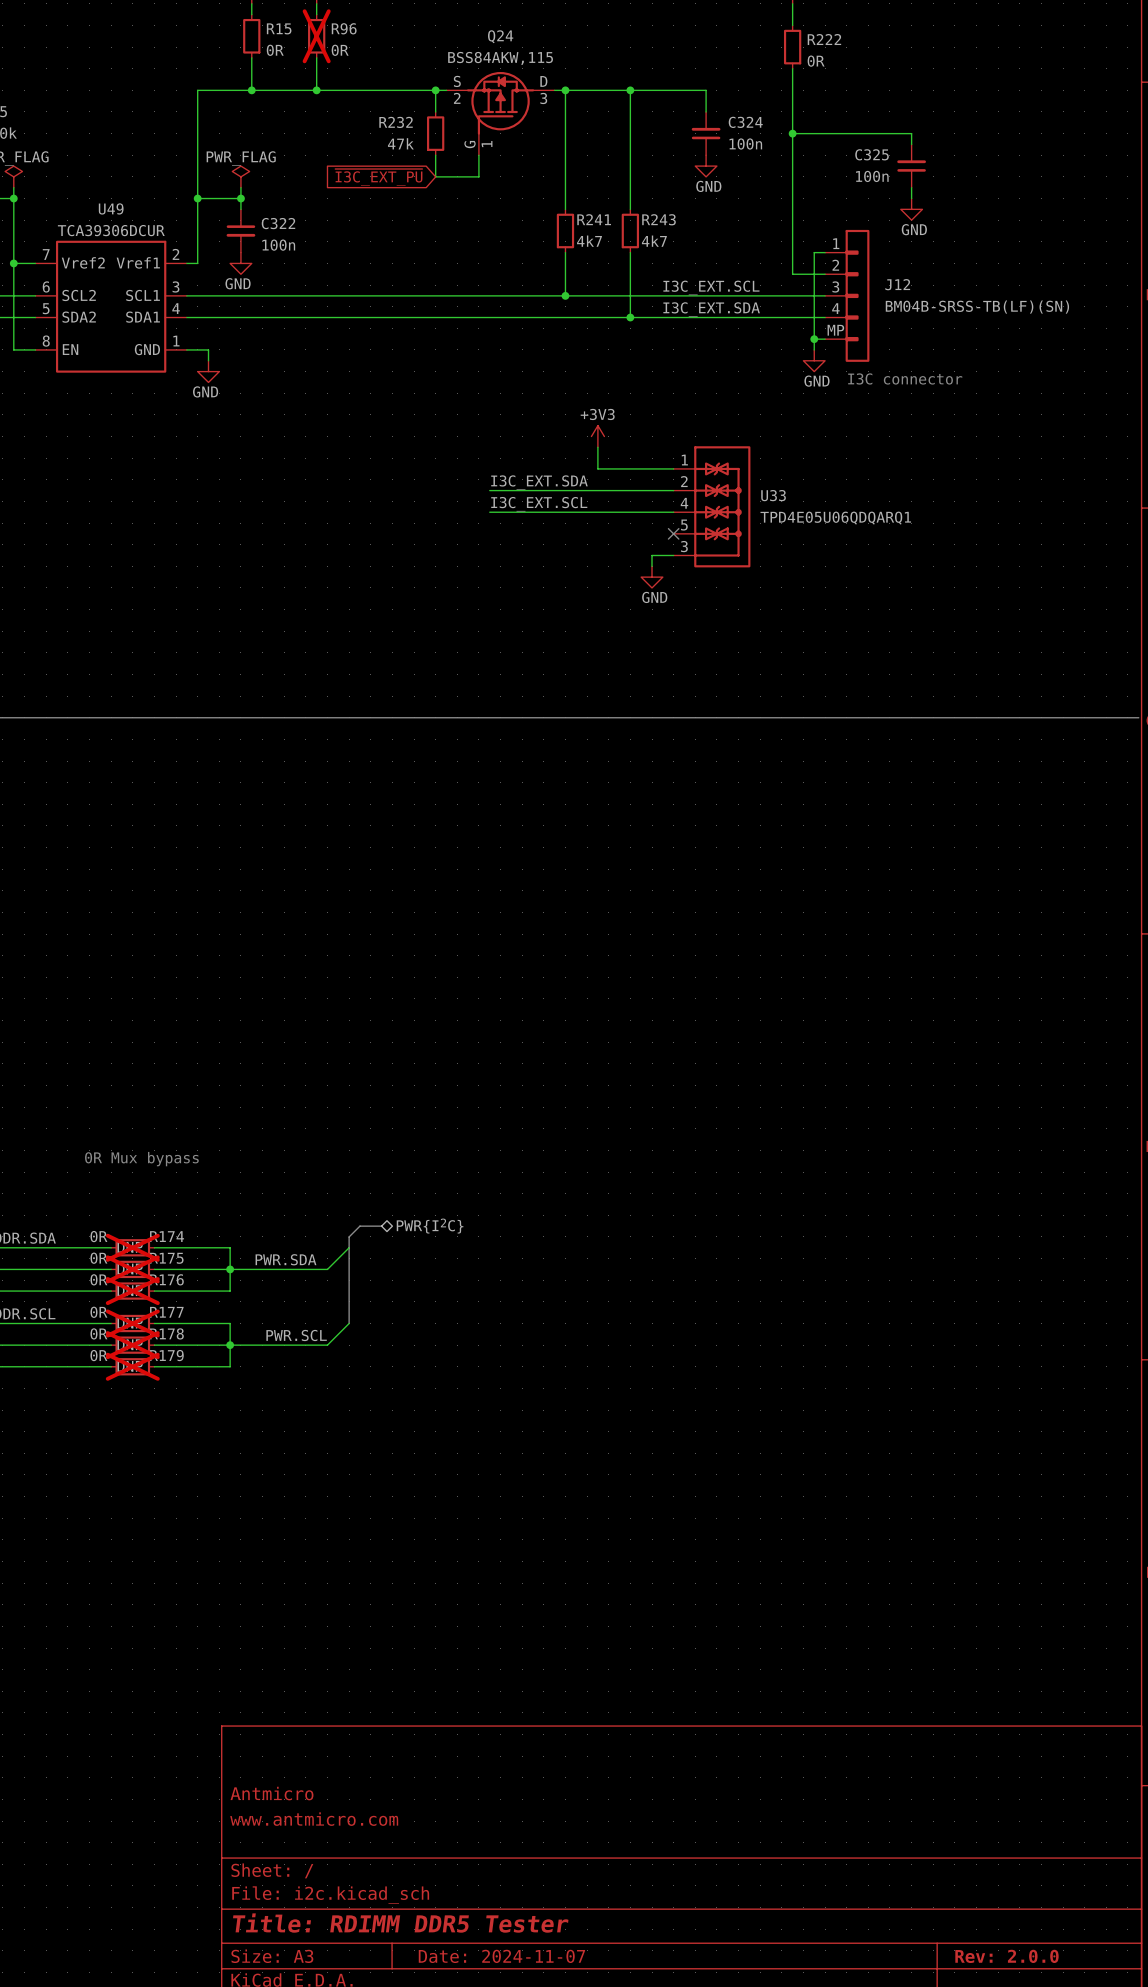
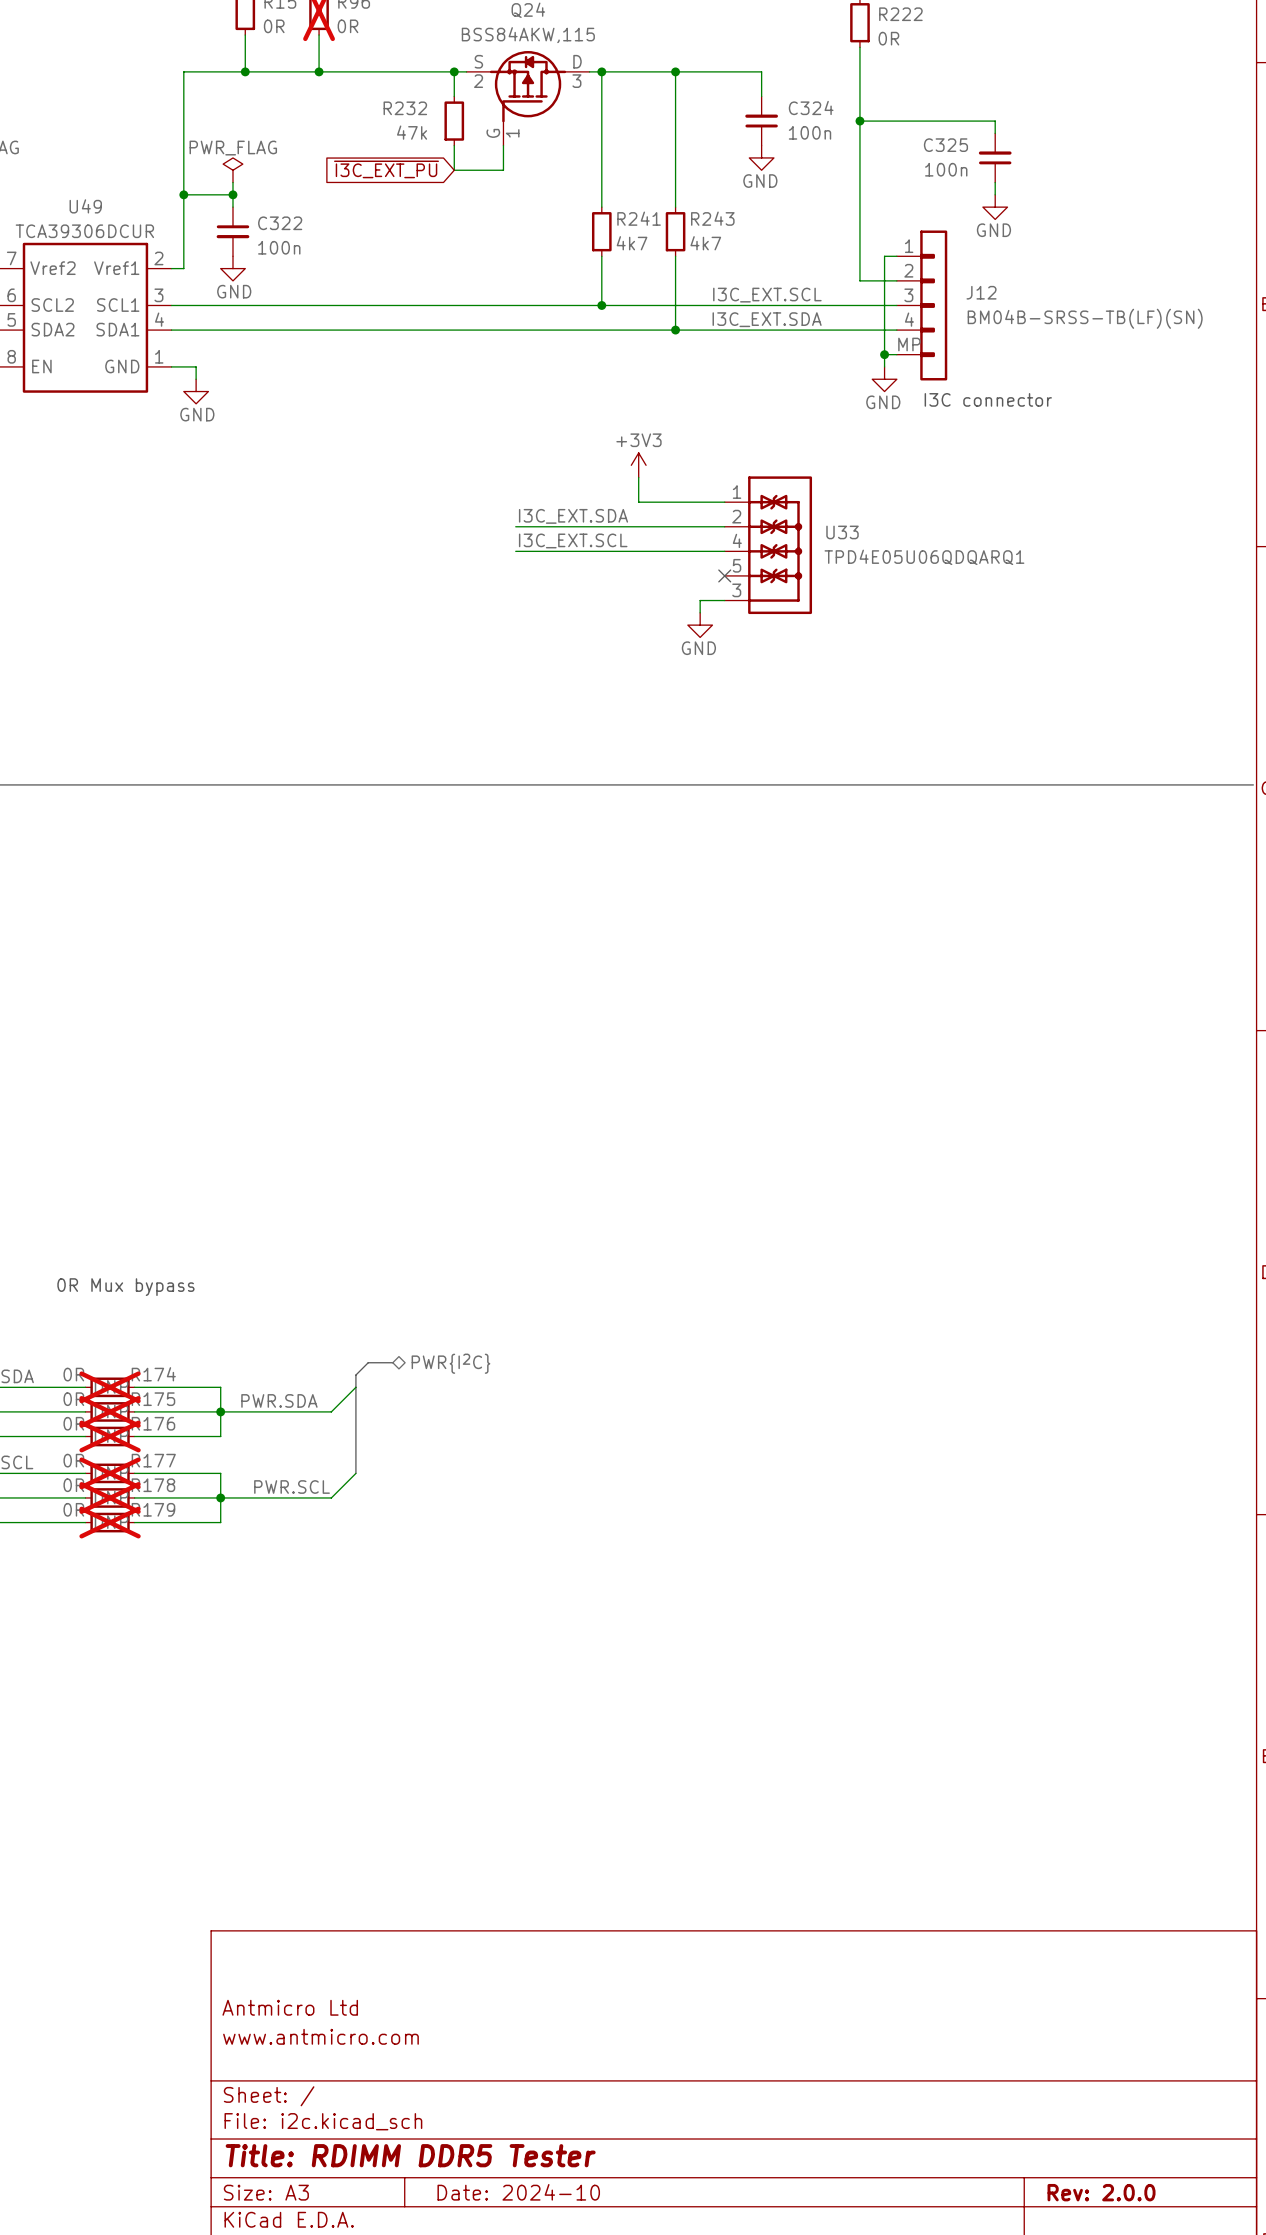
title block: Antmicro (271, 1793) -> Antmicro Ltd (290, 2007)
title block: Date: 2024-11-07 (501, 1956) -> Date: 2024-10 (518, 2192)

